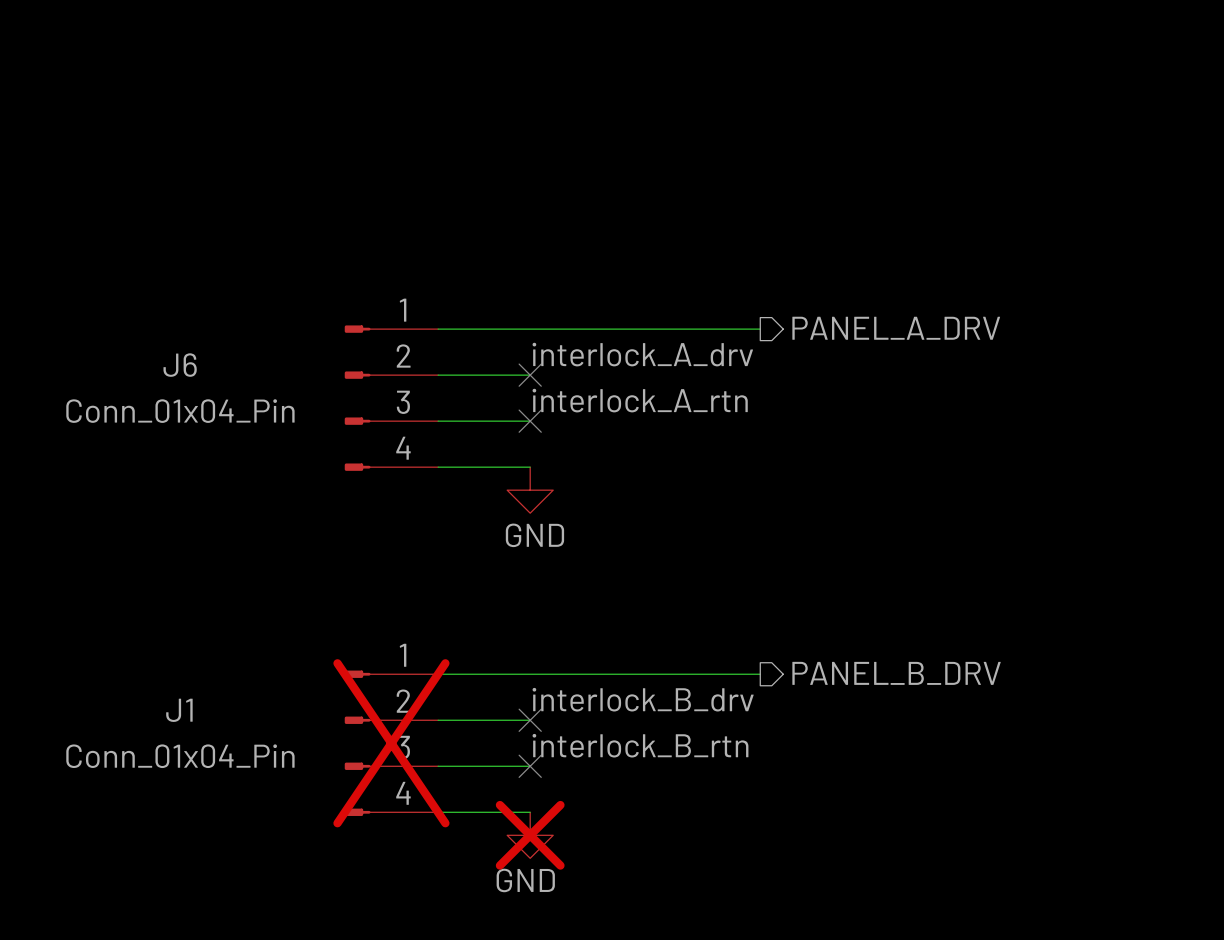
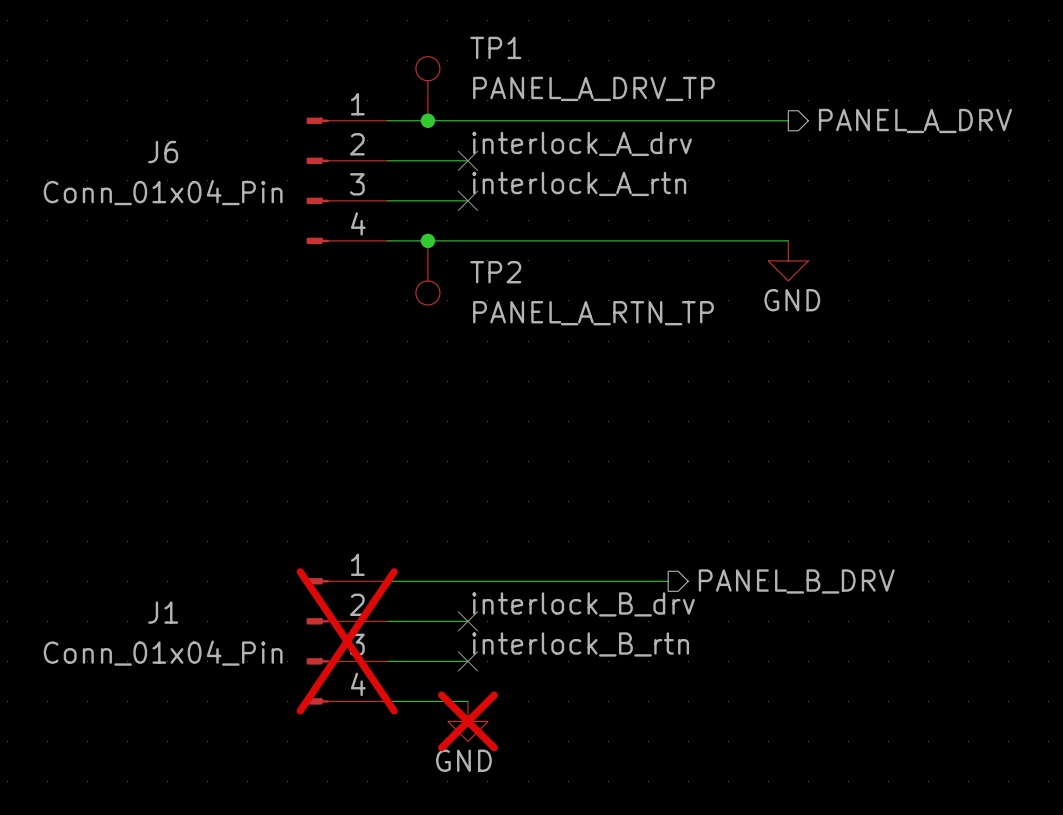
TP1: none -> PANEL_A_DRV_TP (427, 88)
wire: none -> (387, 120) (788, 120)
junction: none -> (427, 120)
no-connect mark: none -> (467, 160)
no-connect mark: none -> (467, 200)
wire: none -> (387, 240) (788, 240)
junction: none -> (427, 240)
TP2: none -> PANEL_A_RTN_TP (427, 272)
hierarchical label position: PANEL_A_DRV (896, 328) -> PANEL_A_DRV (915, 120)
wire: (438, 329) (760, 329) -> none
label position: interlock_A_drv (642, 354) -> interlock_A_drv (582, 143)
wire: (438, 375) (530, 375) -> (387, 160) (467, 160)
no-connect mark: (530, 375) -> none
J6 position: (391, 398) -> (347, 180)
label position: interlock_A_rtn (640, 400) -> interlock_A_rtn (579, 183)
wire: (438, 421) (530, 421) -> (387, 200) (467, 200)
no-connect mark: (530, 421) -> none
wire: (438, 467) (530, 467) -> none
power symbol position: GND (530, 490) -> GND (788, 260)

